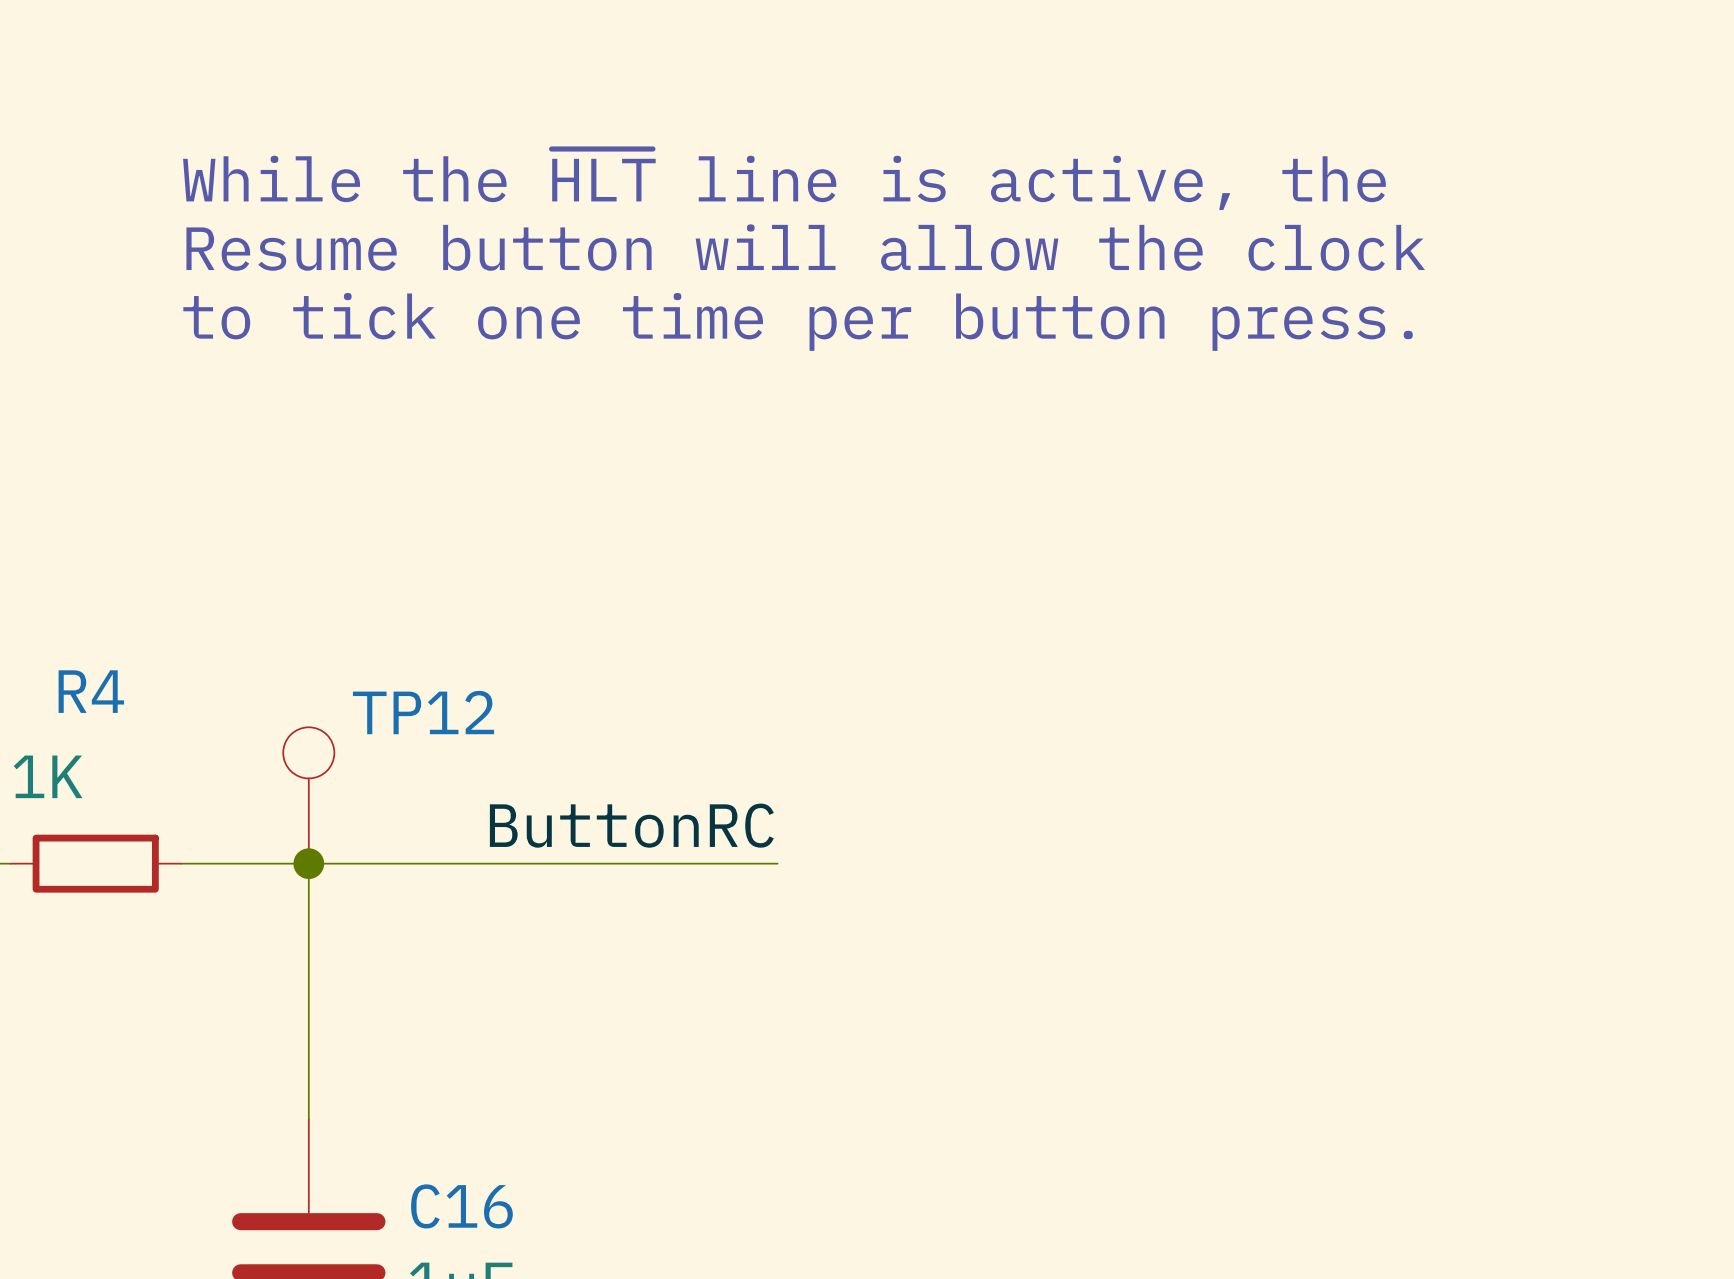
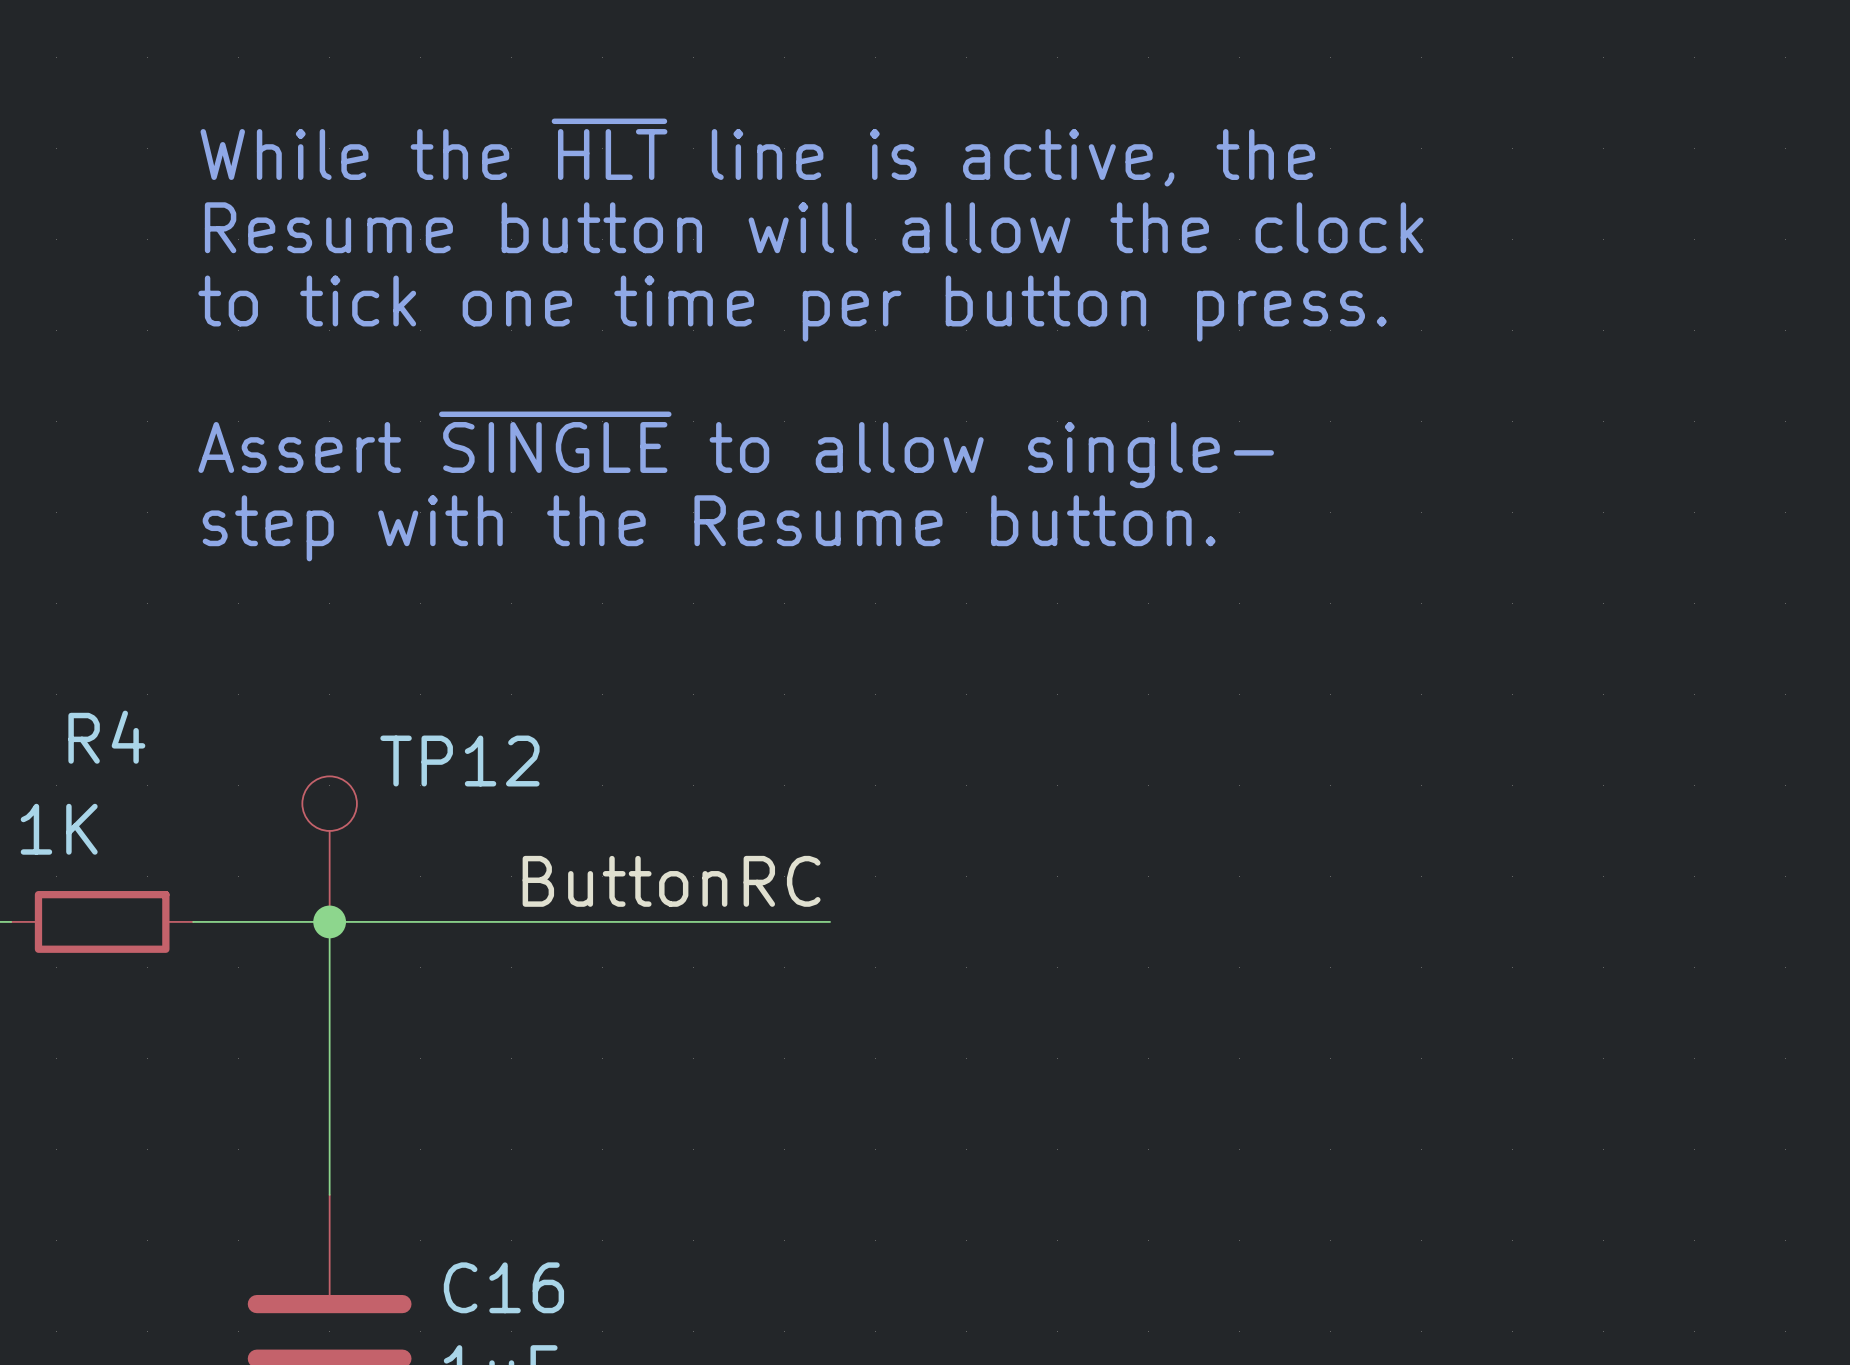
text position: While the ~{HLT} line is active, the (784, 179) -> While the ~{HLT} line is active, the (757, 152)
text position: Resume button will allow the clock (805, 247) -> Resume button will allow the clock (814, 227)
text position: to tick one time per button press. (798, 321) -> to tick one time per button press. (792, 308)
text: none -> Assert ~{SINGLE} to allow single- (736, 449)
text: none -> step with the Resume button. (709, 528)

